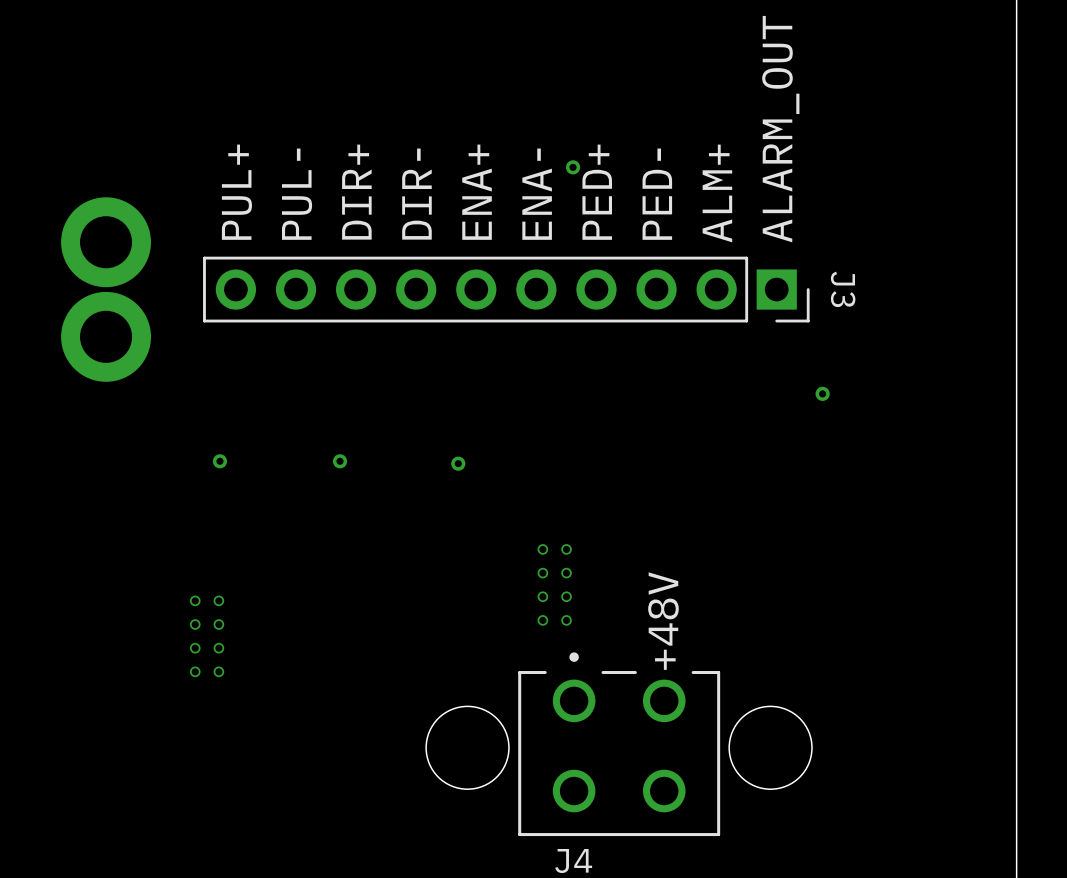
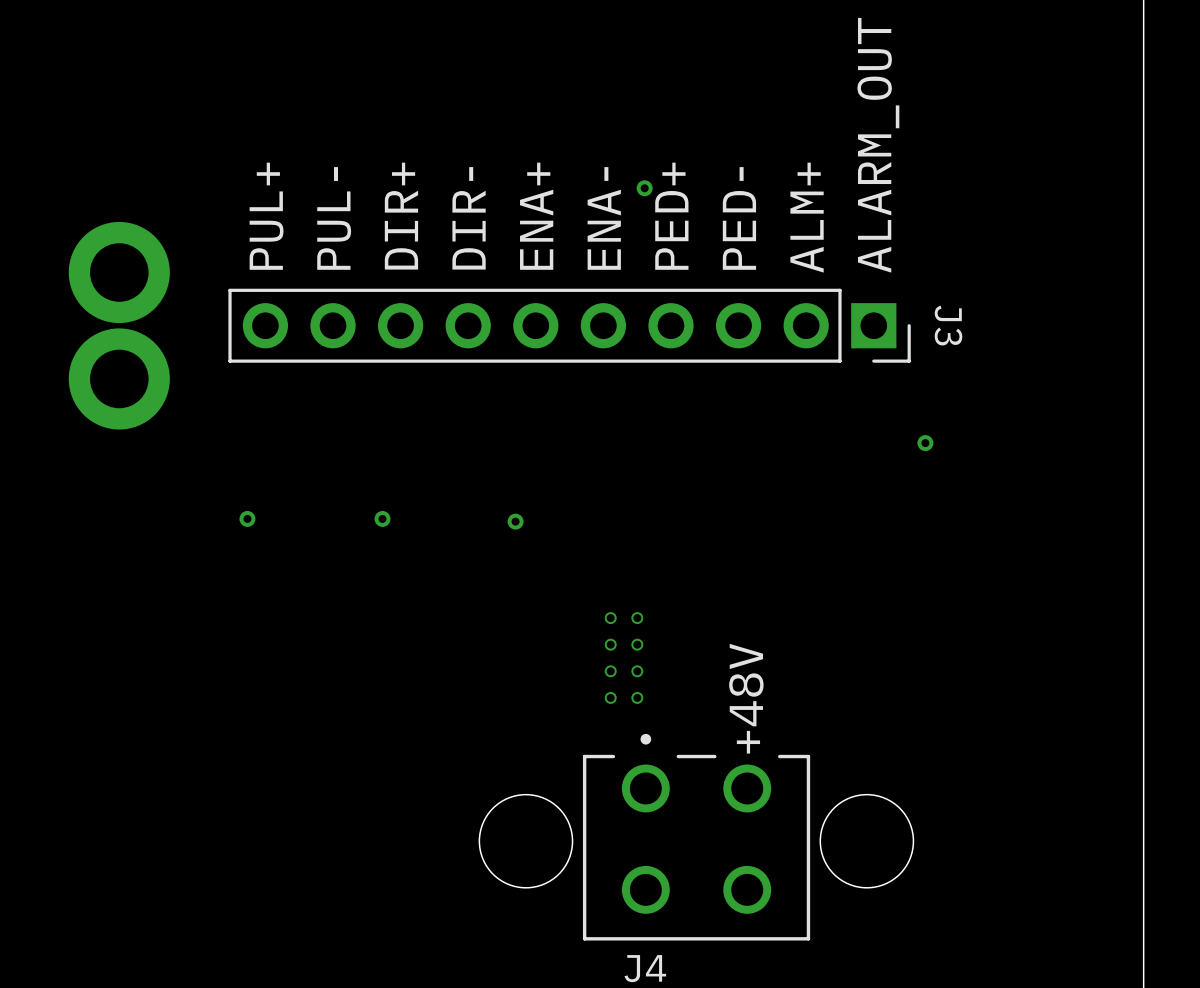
via: (195, 600) -> none
via: (218, 600) -> none
via: (195, 624) -> none
via: (218, 624) -> none
via: (195, 648) -> none
via: (218, 648) -> none
via: (195, 671) -> none
via: (218, 671) -> none

